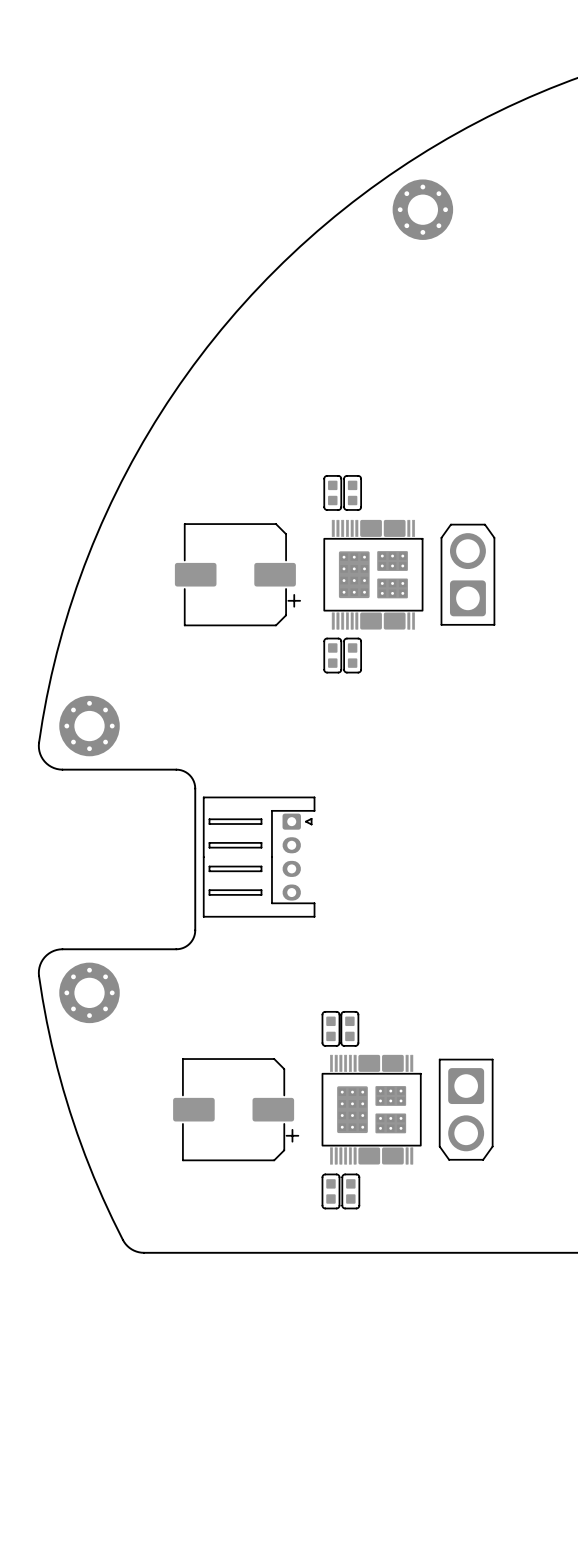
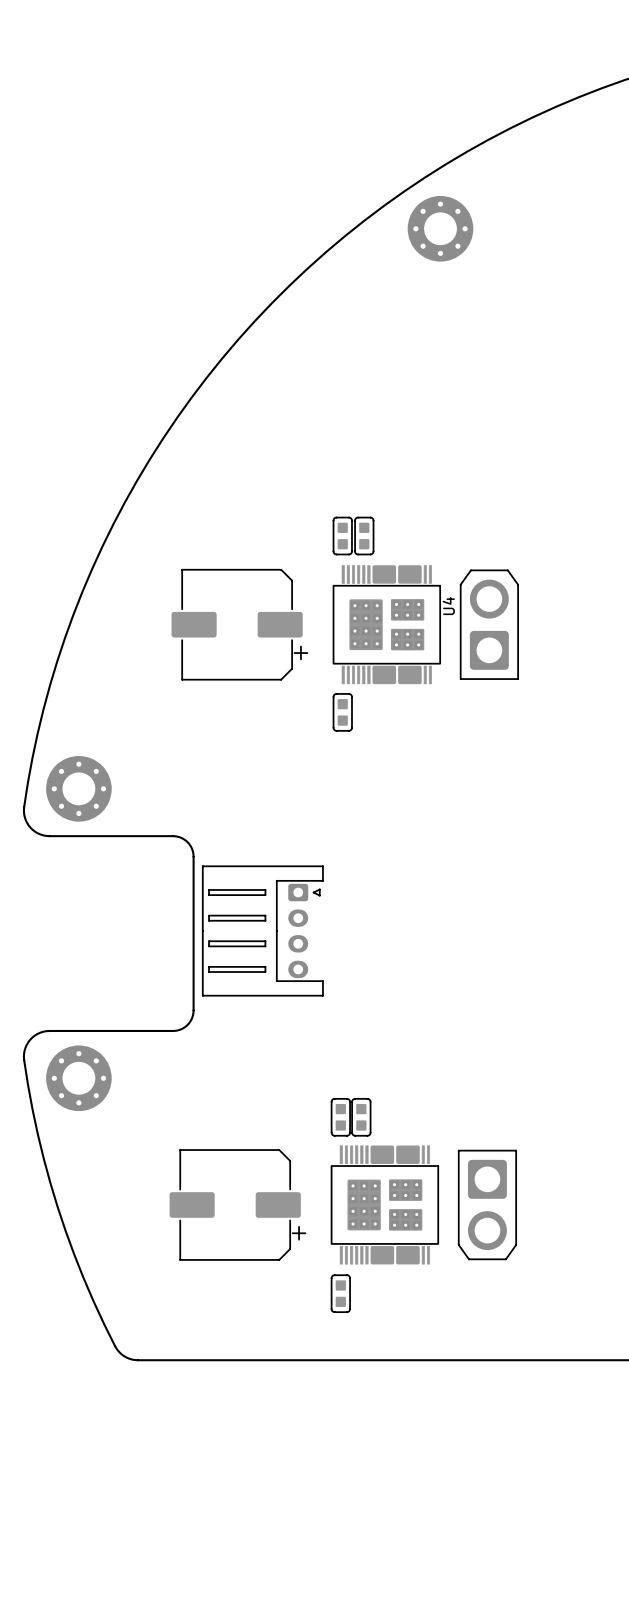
U4 name: none -> U4 (448, 605)
part: (352, 655) -> none
part: (350, 1191) -> none

